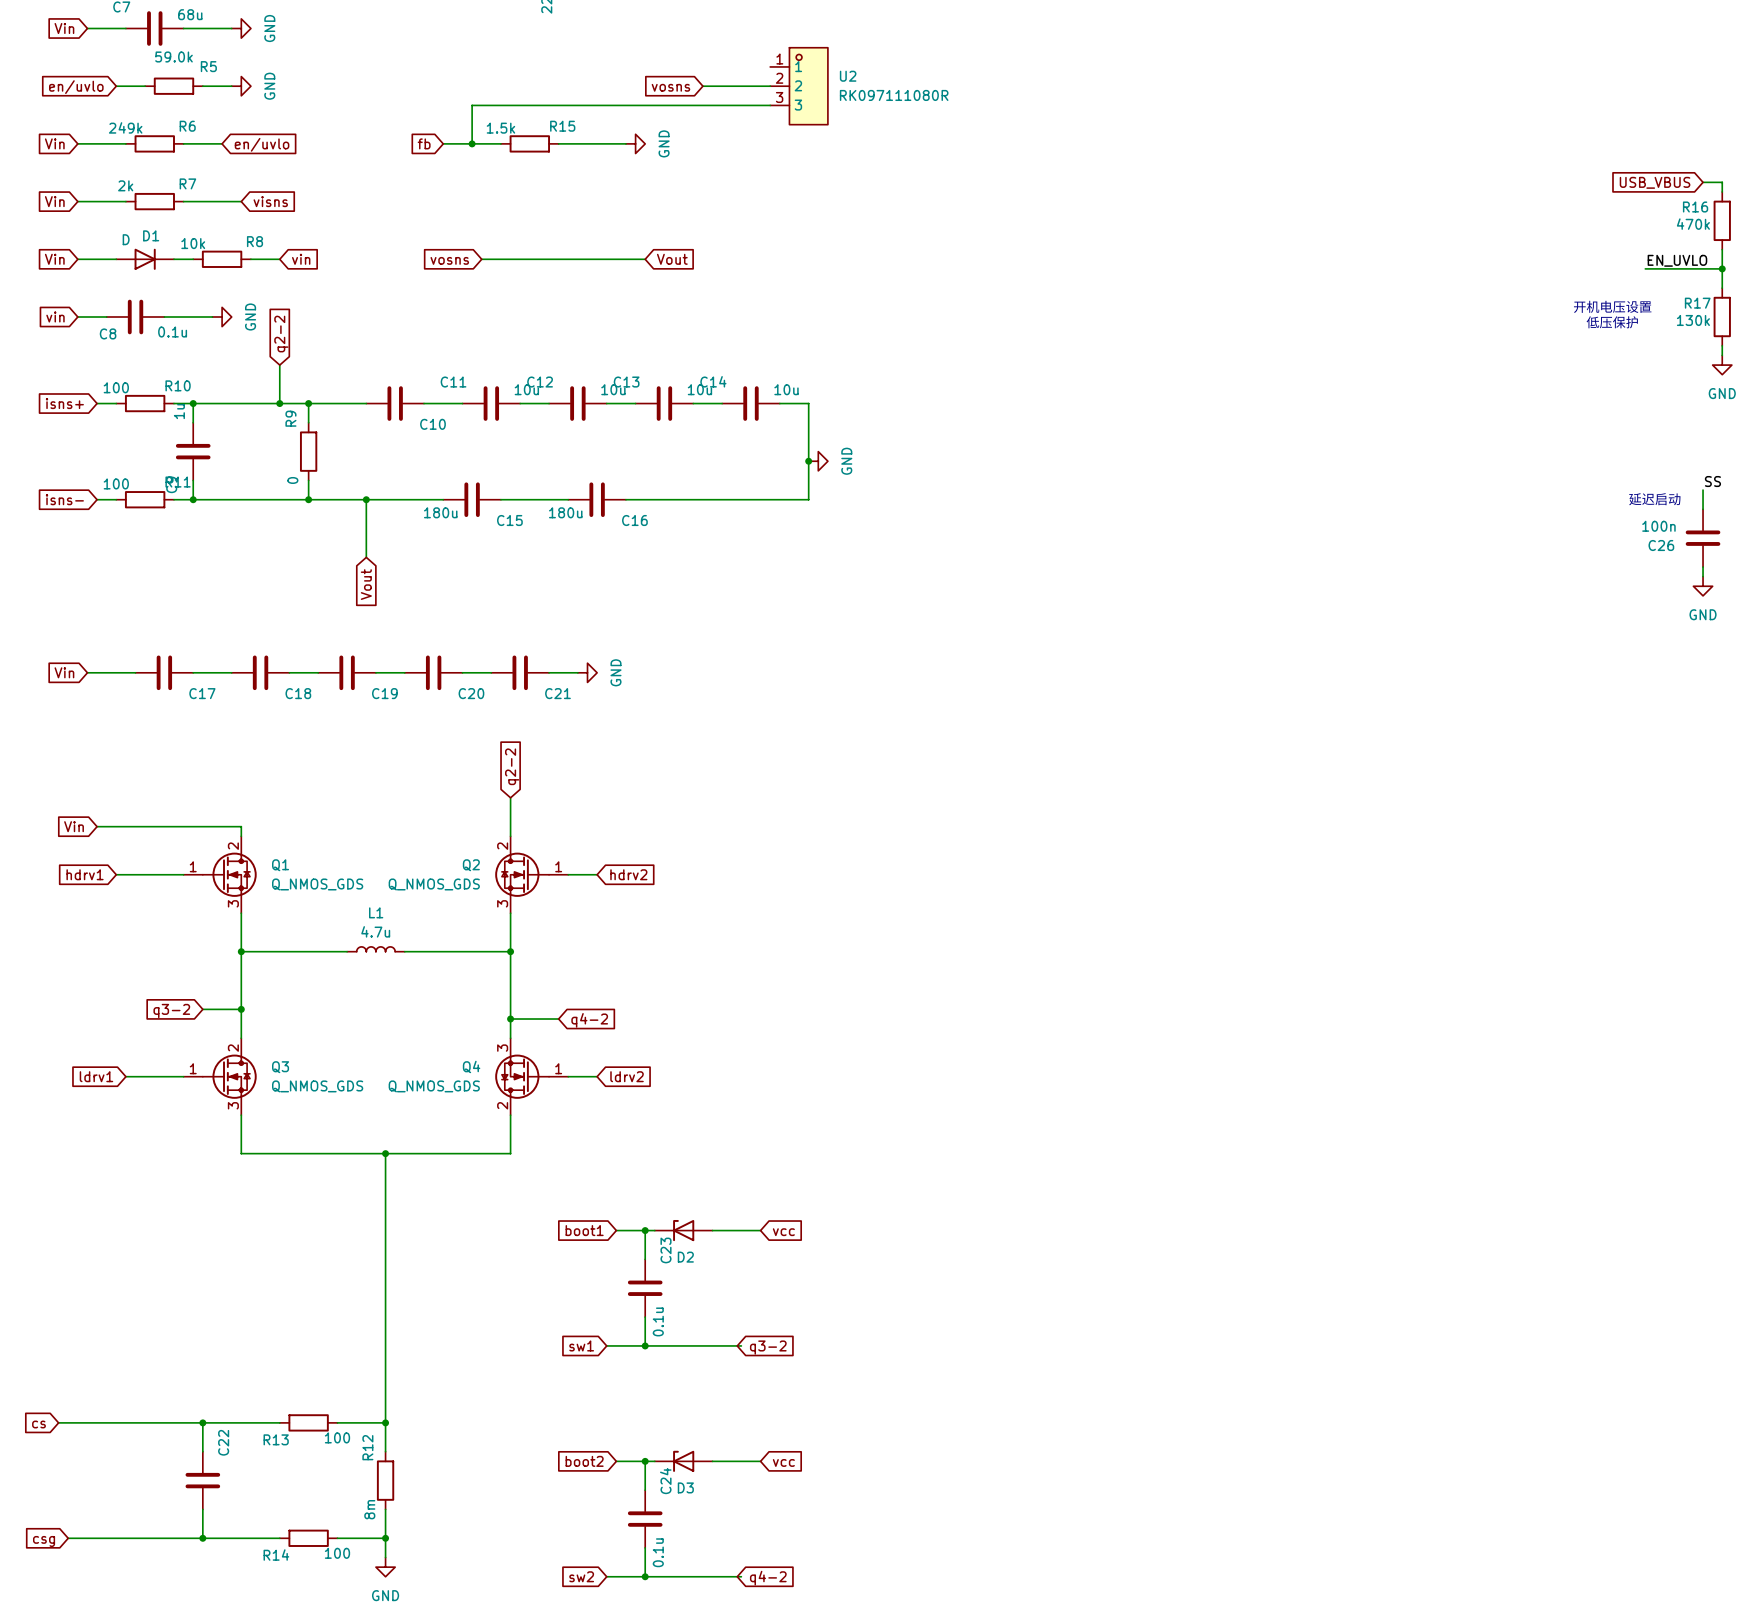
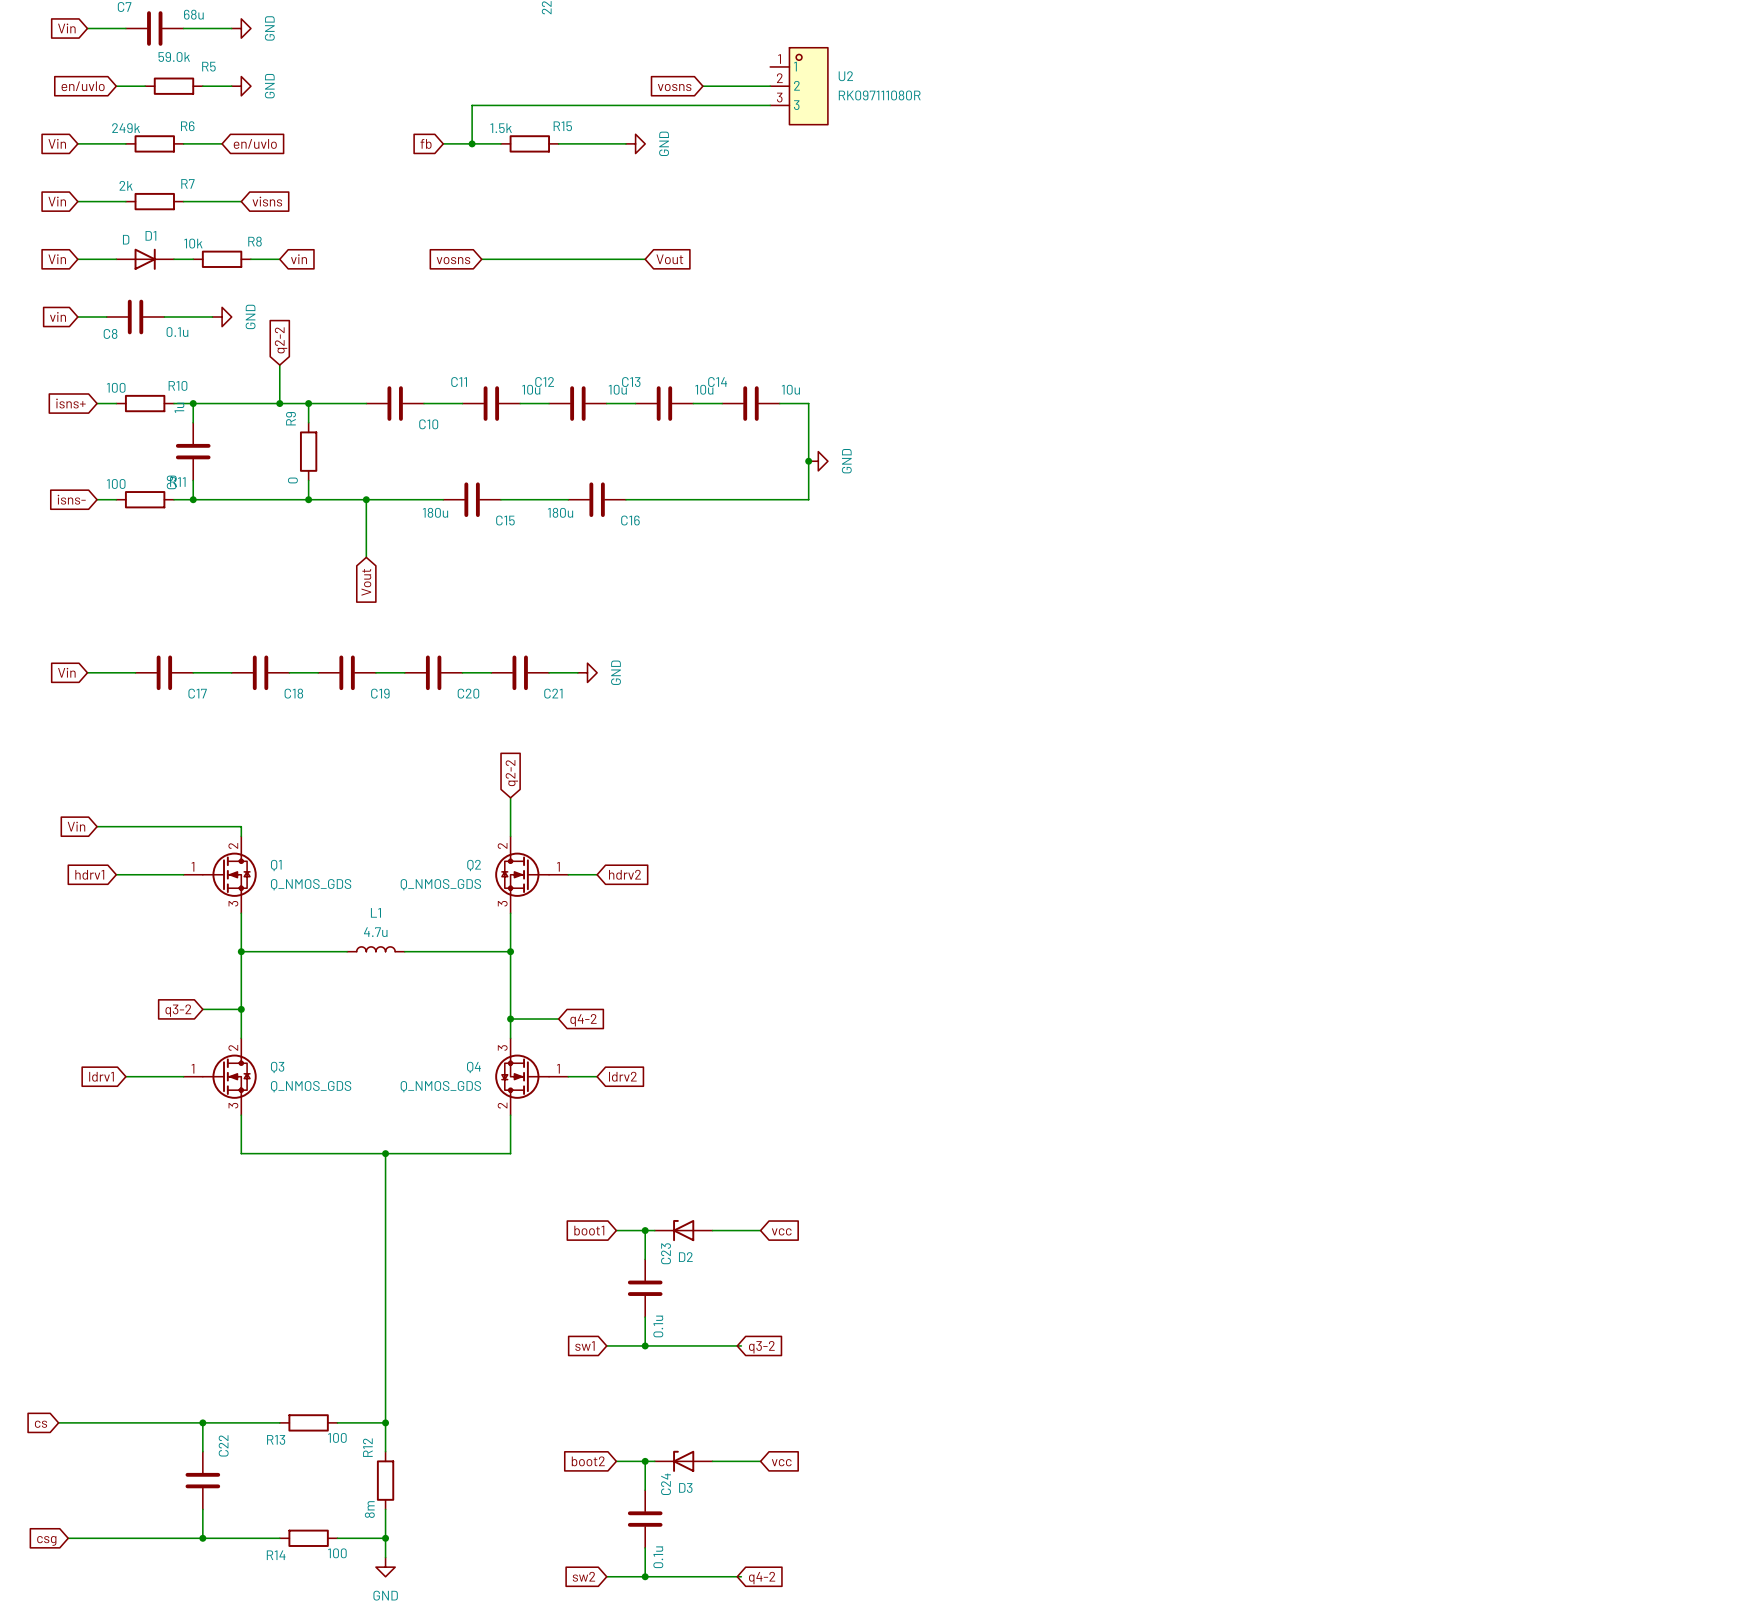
global label: USB_VBUS (1655, 182) -> none
wire: (1703, 182) (1722, 182) (1722, 191) -> none
R16: 470k (1722, 220) -> none
wire: (1722, 249) (1722, 288) -> none
label: EN_UVLO (1677, 260) -> none
wire: (1645, 268) (1722, 268) -> none
junction: (1722, 268) -> none
text: 开机电压设置 (1612, 306) -> none
R17: 130k (1722, 317) -> none
text: 低压保护 (1612, 322) -> none
wire: (1722, 345) (1722, 355) -> none
power symbol: GND (1722, 365) -> none
label: SS (1712, 481) -> none
wire: (1703, 490) (1703, 509) -> none
text: 延迟启动 (1654, 499) -> none
C26: 100n (1703, 538) -> none
wire: (1703, 567) (1703, 576) -> none
power symbol: GND (1703, 586) -> none

